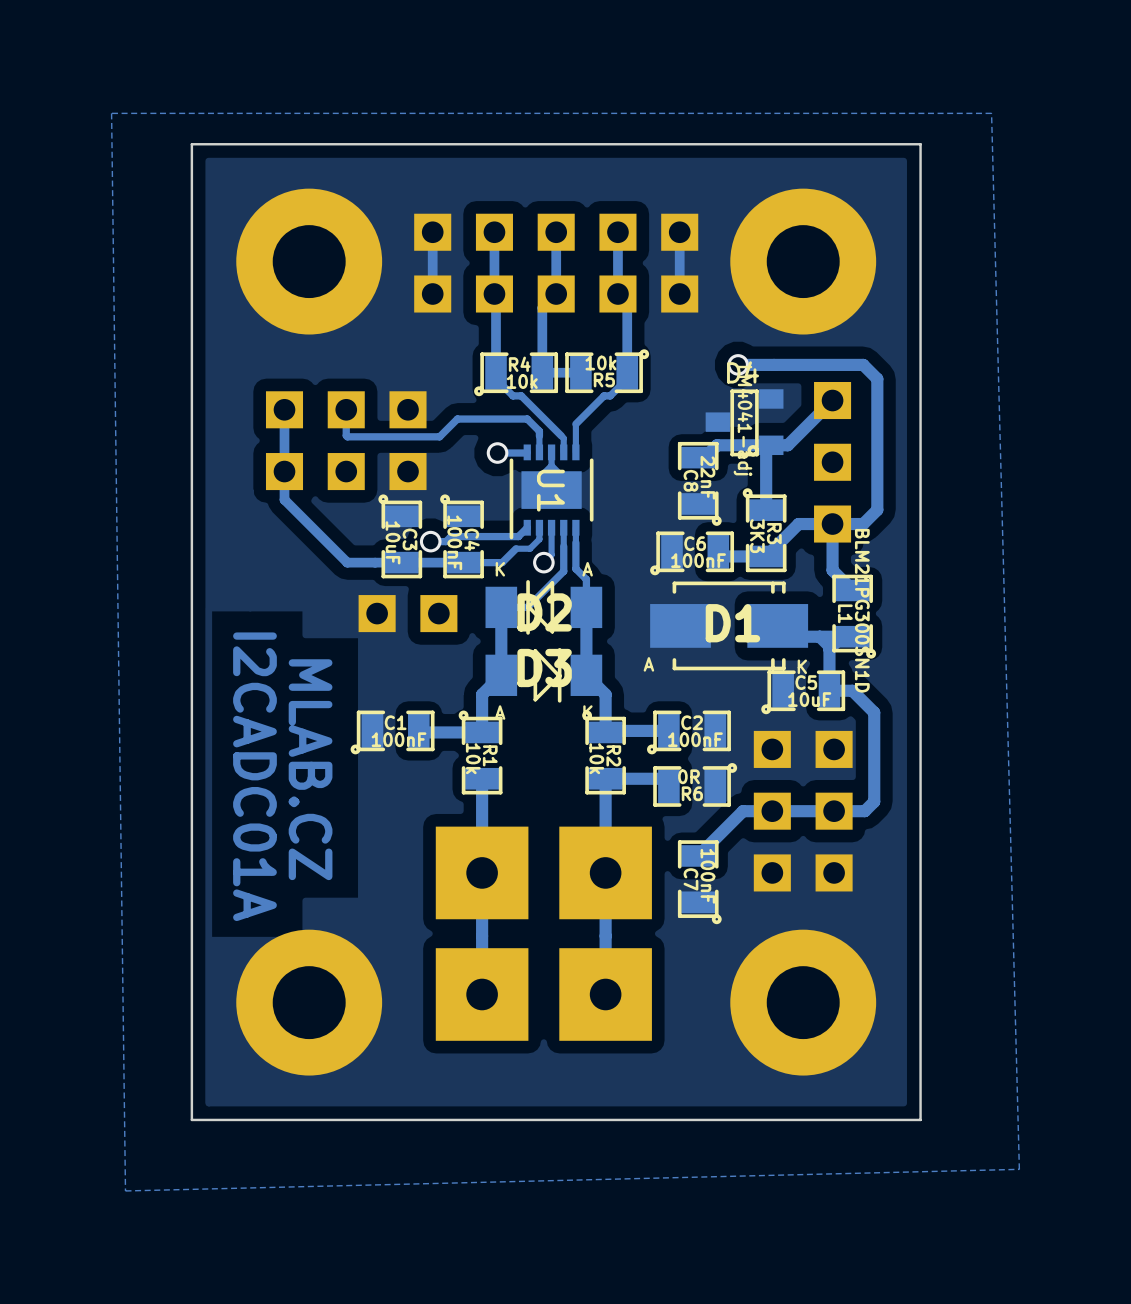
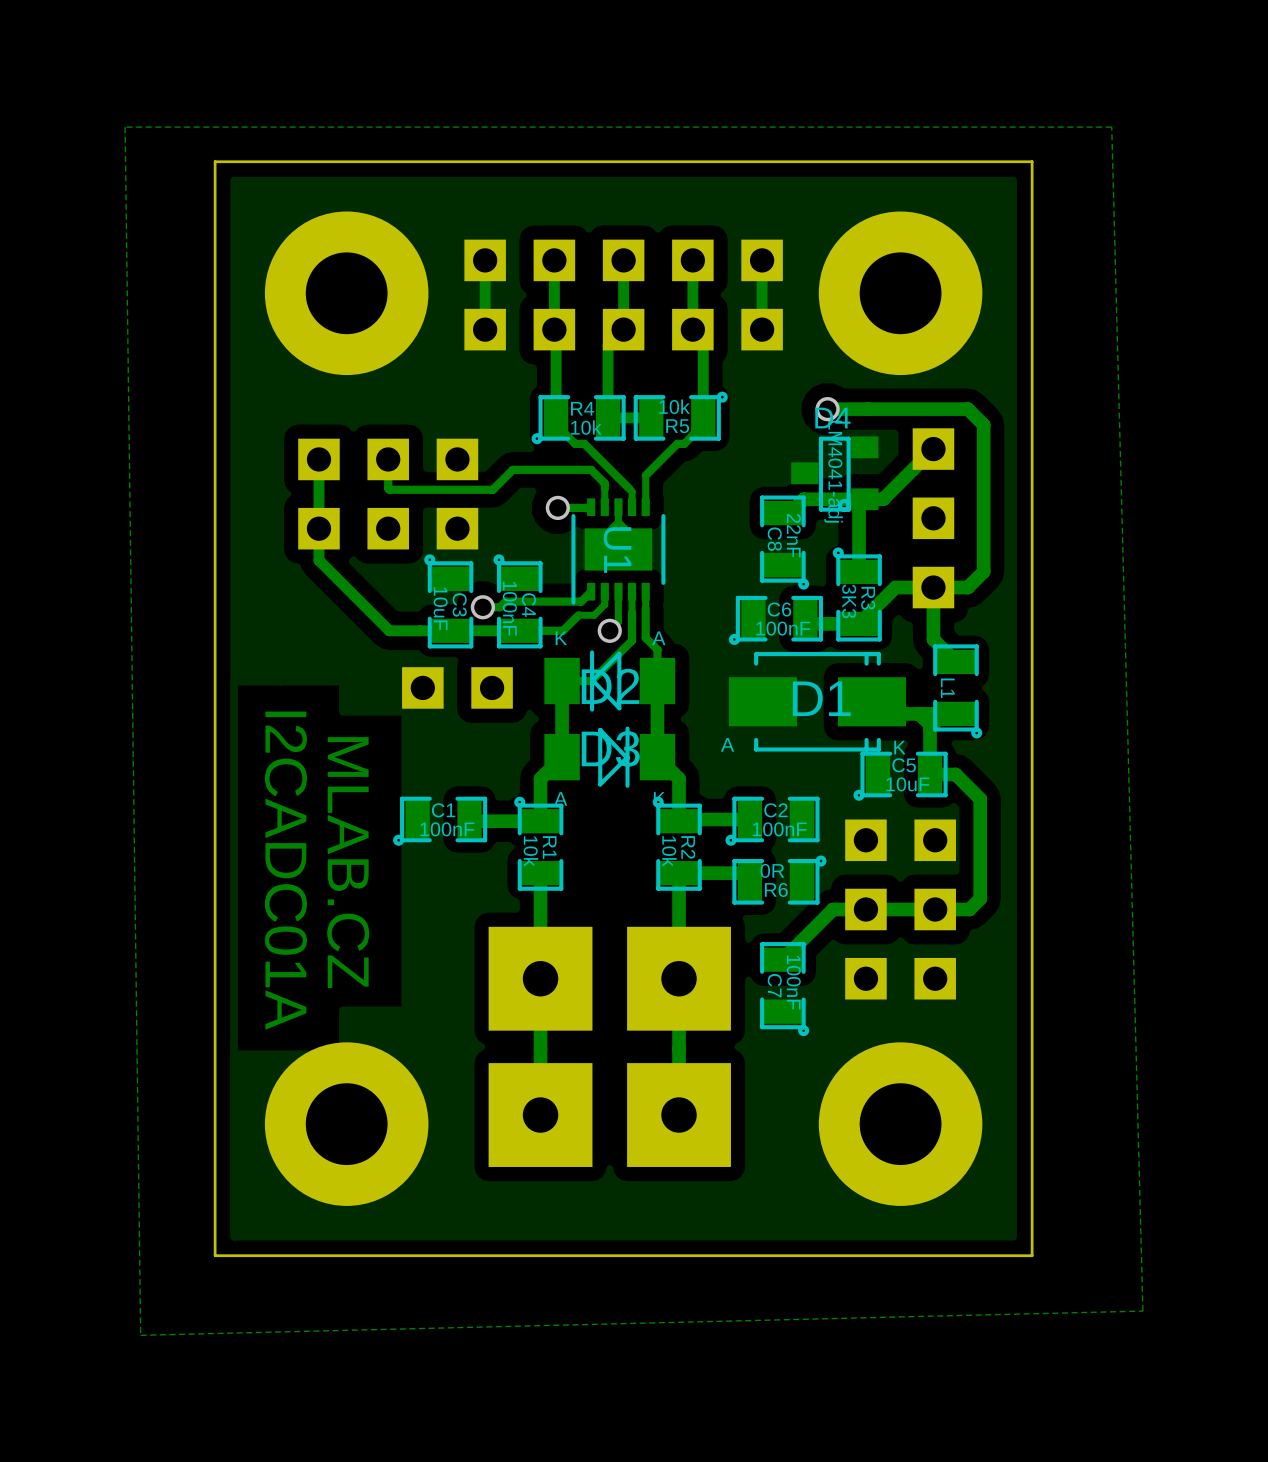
L1 value: BLM21PG300SN1D (862, 610) -> none

